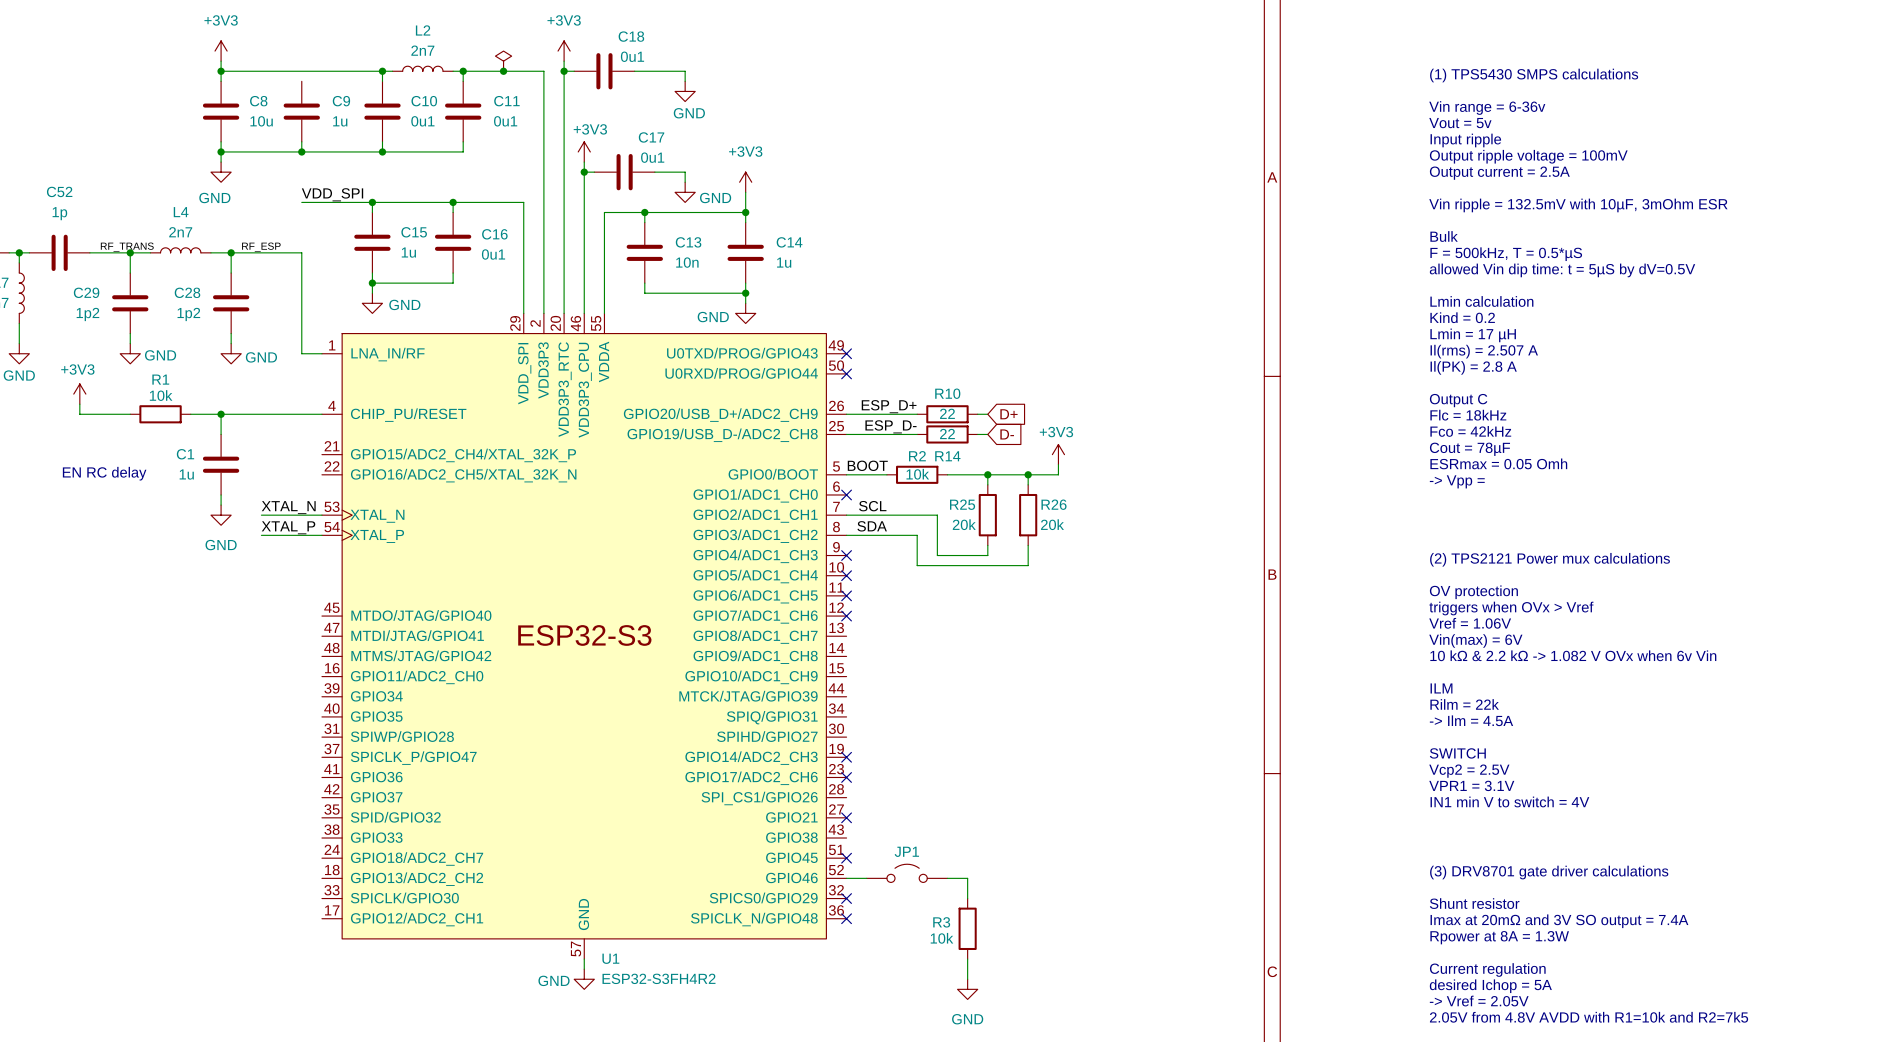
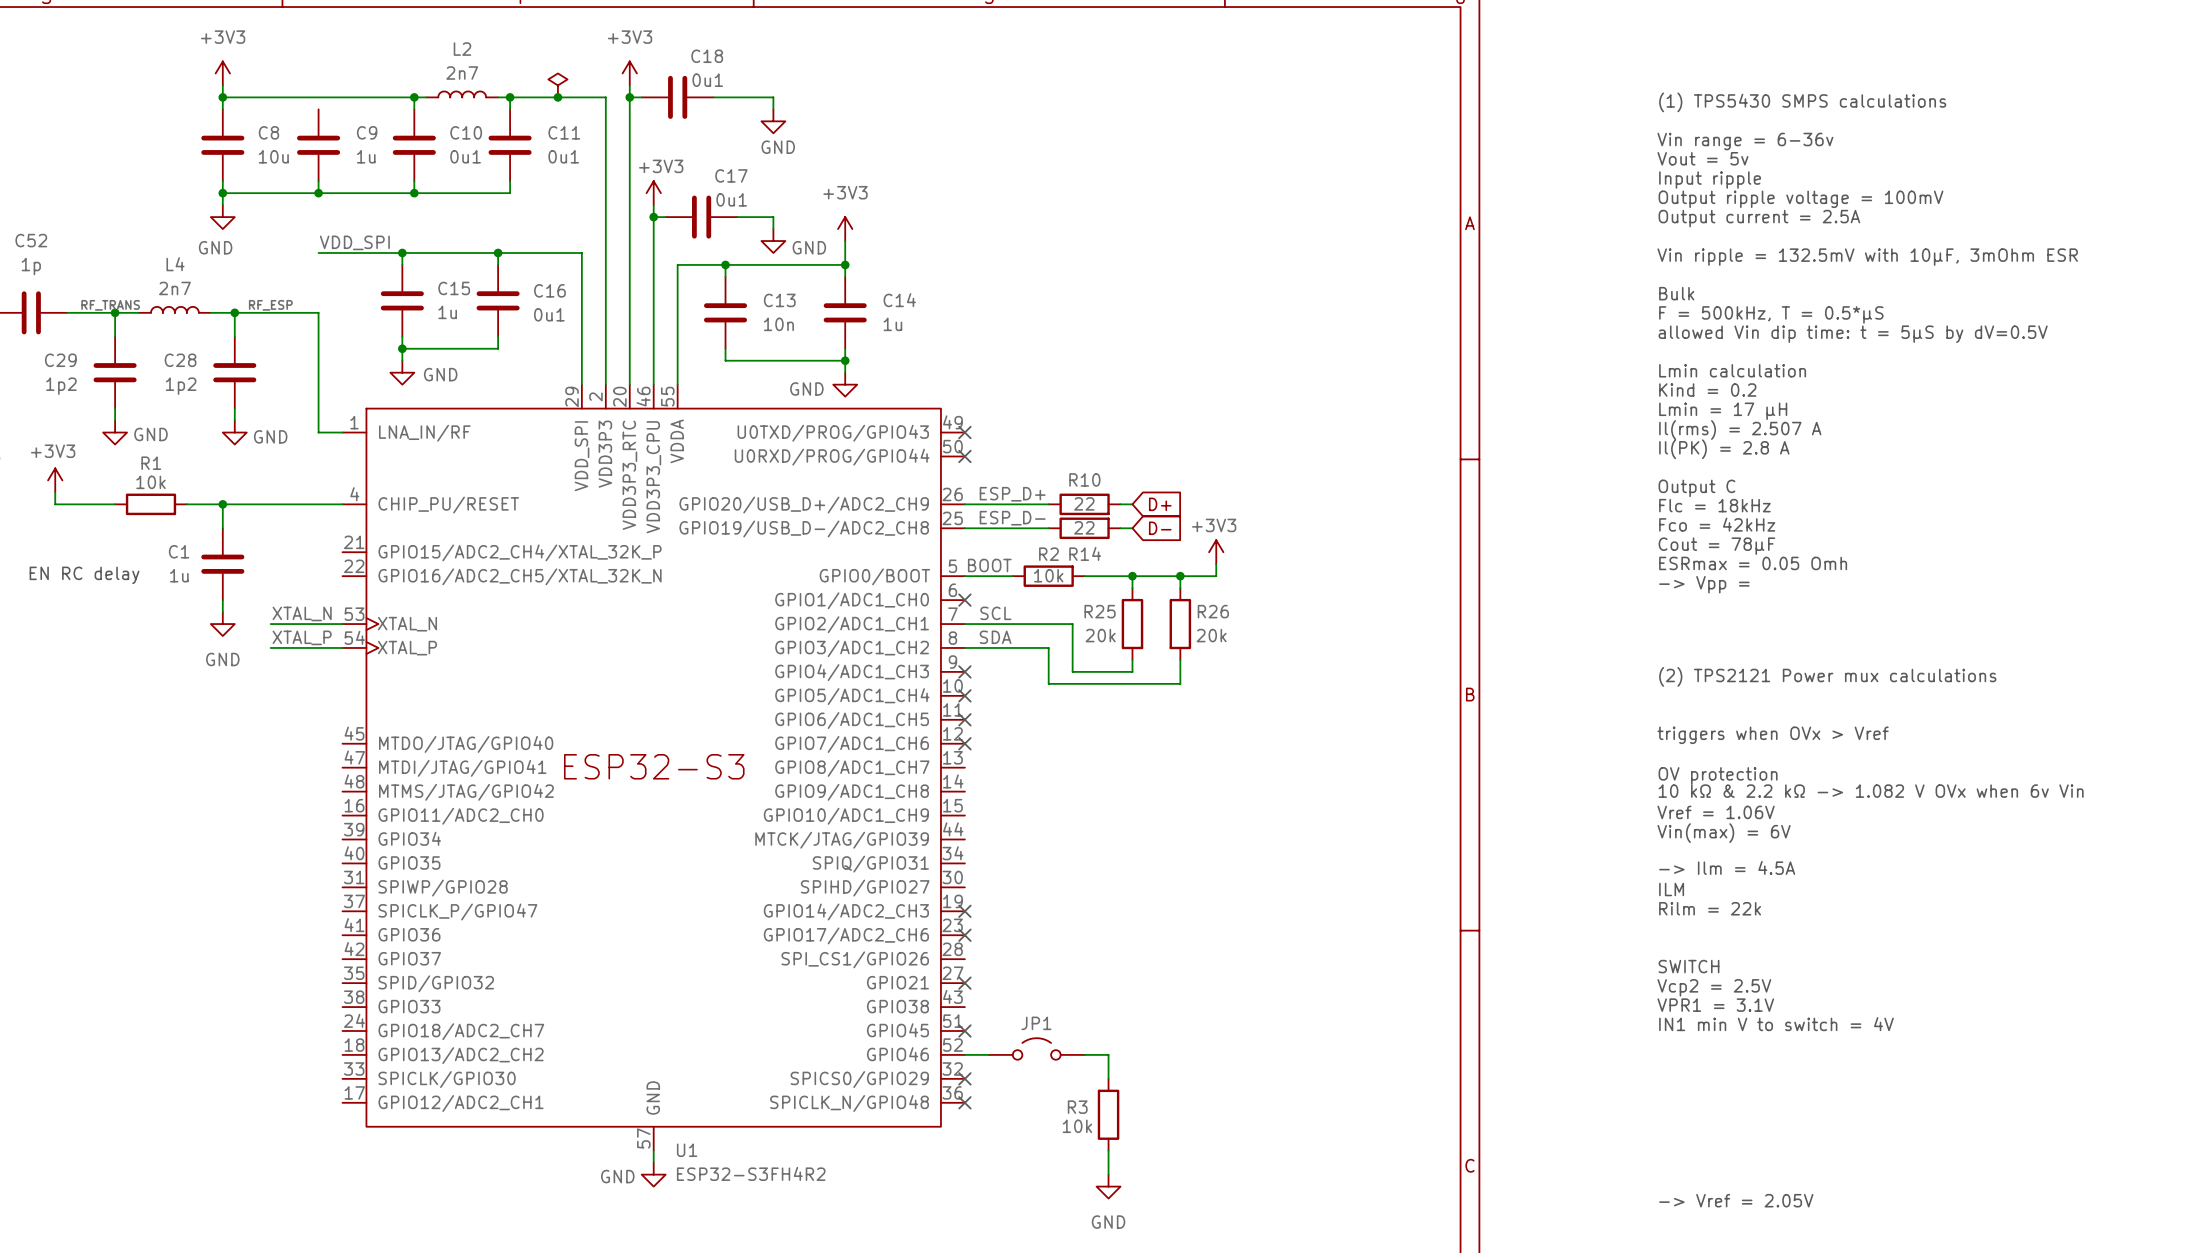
text position: OV protection (1473, 592) -> OV protection (1718, 775)
text position: Vref = 1.06V (1470, 623) -> Vref = 1.06V (1716, 812)
text position: Vin(max) = 6V (1475, 640) -> Vin(max) = 6V (1724, 833)
text position: ILM (1441, 688) -> ILM (1671, 889)
text position: Rilm = 22k (1464, 704) -> Rilm = 22k (1710, 908)
text position: SWITCH (1457, 753) -> SWITCH (1688, 966)
text position: Vcp2 = 2.5V (1469, 771) -> Vcp2 = 2.5V (1714, 987)
text position: VPR1 = 3.1V (1471, 785) -> VPR1 = 3.1V (1715, 1005)
text position: IN1 min V to switch = 4V (1509, 801) -> IN1 min V to switch = 4V (1776, 1024)
text: (3) DRV8701 gate driver calculations (1549, 872) -> none
text: Shunt resistor (1474, 903) -> none
text: Imax at 20mΩ and 3V SO output = 7.4A (1559, 921) -> none
text: Rpower at 8A = 1.3W (1499, 937) -> none
text: Current regulation (1487, 969) -> none
text: desired Ichop = 5A (1490, 986) -> none
text: 2.05V from 4.8V AVDD with R1=10k and R2=7k5 (1589, 1017) -> none

